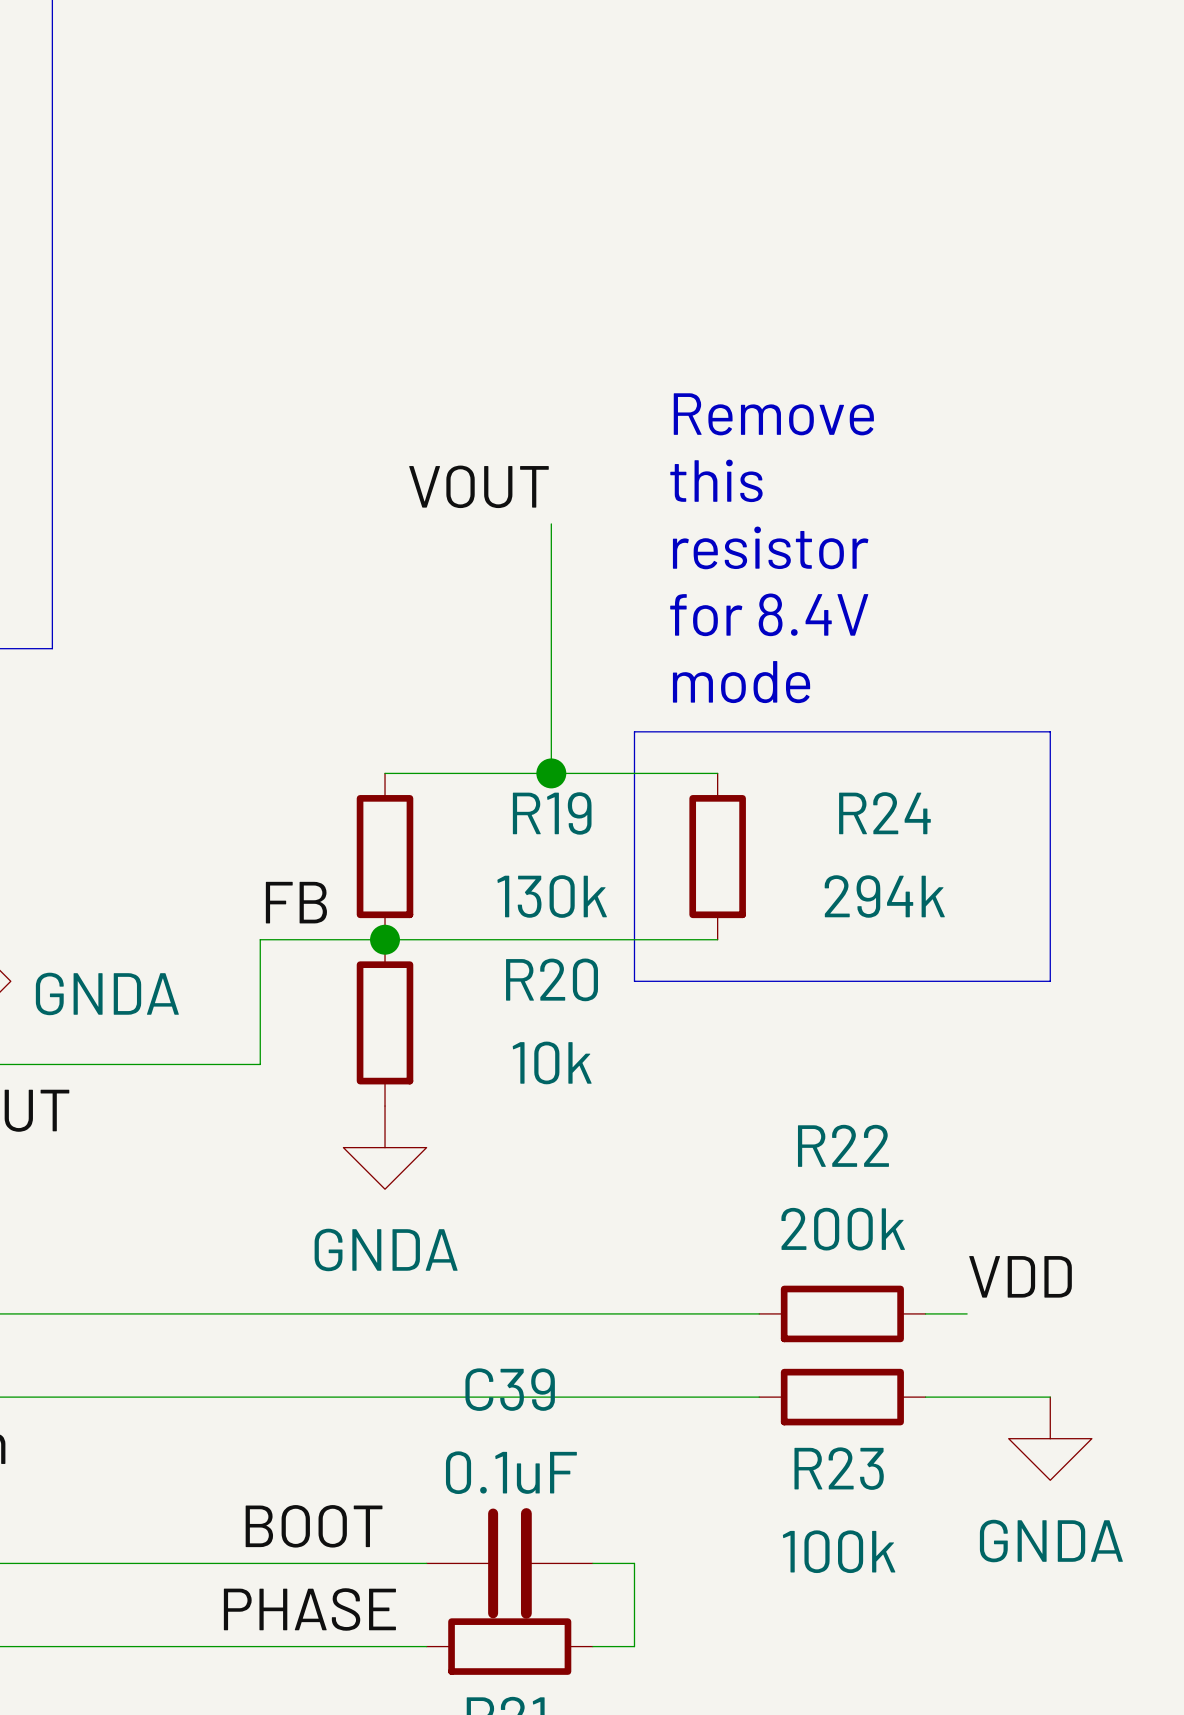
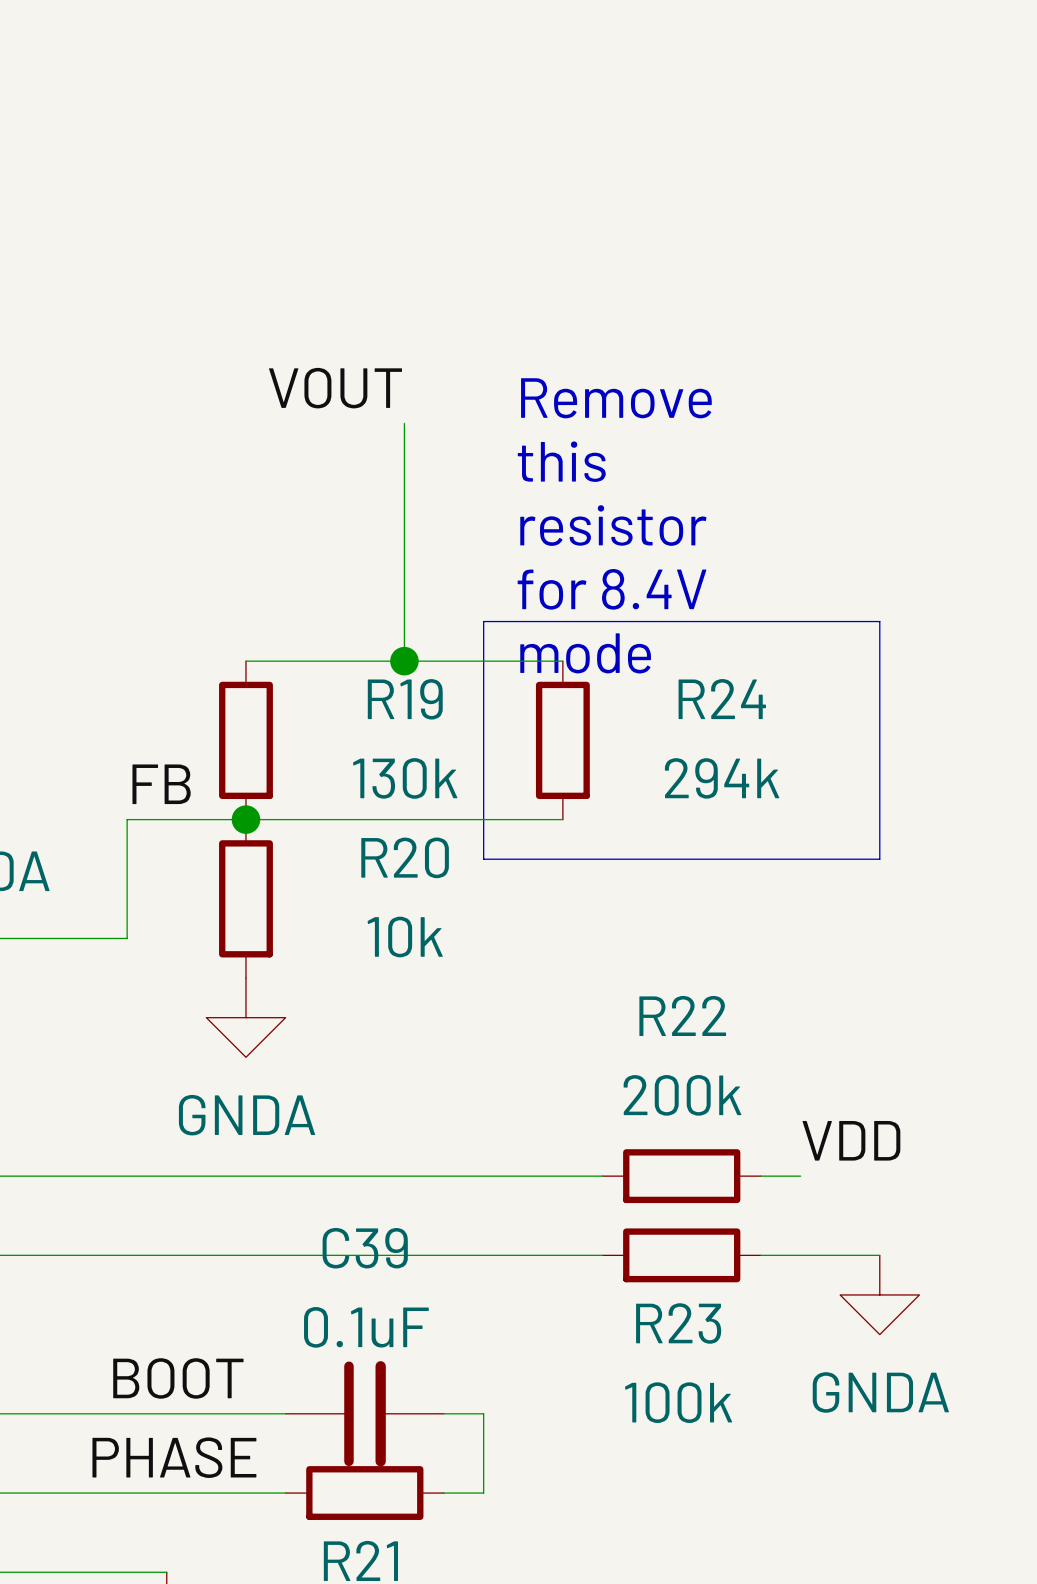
text: Remove (773, 414) -> none
text: this (716, 480) -> Remove (616, 398)
text: resistor (770, 547) -> this (561, 461)
text: for 8.4V (769, 614) -> resistor (613, 525)
text: mode (741, 682) -> for 8.4V (612, 589)
text: none -> mode (585, 653)

